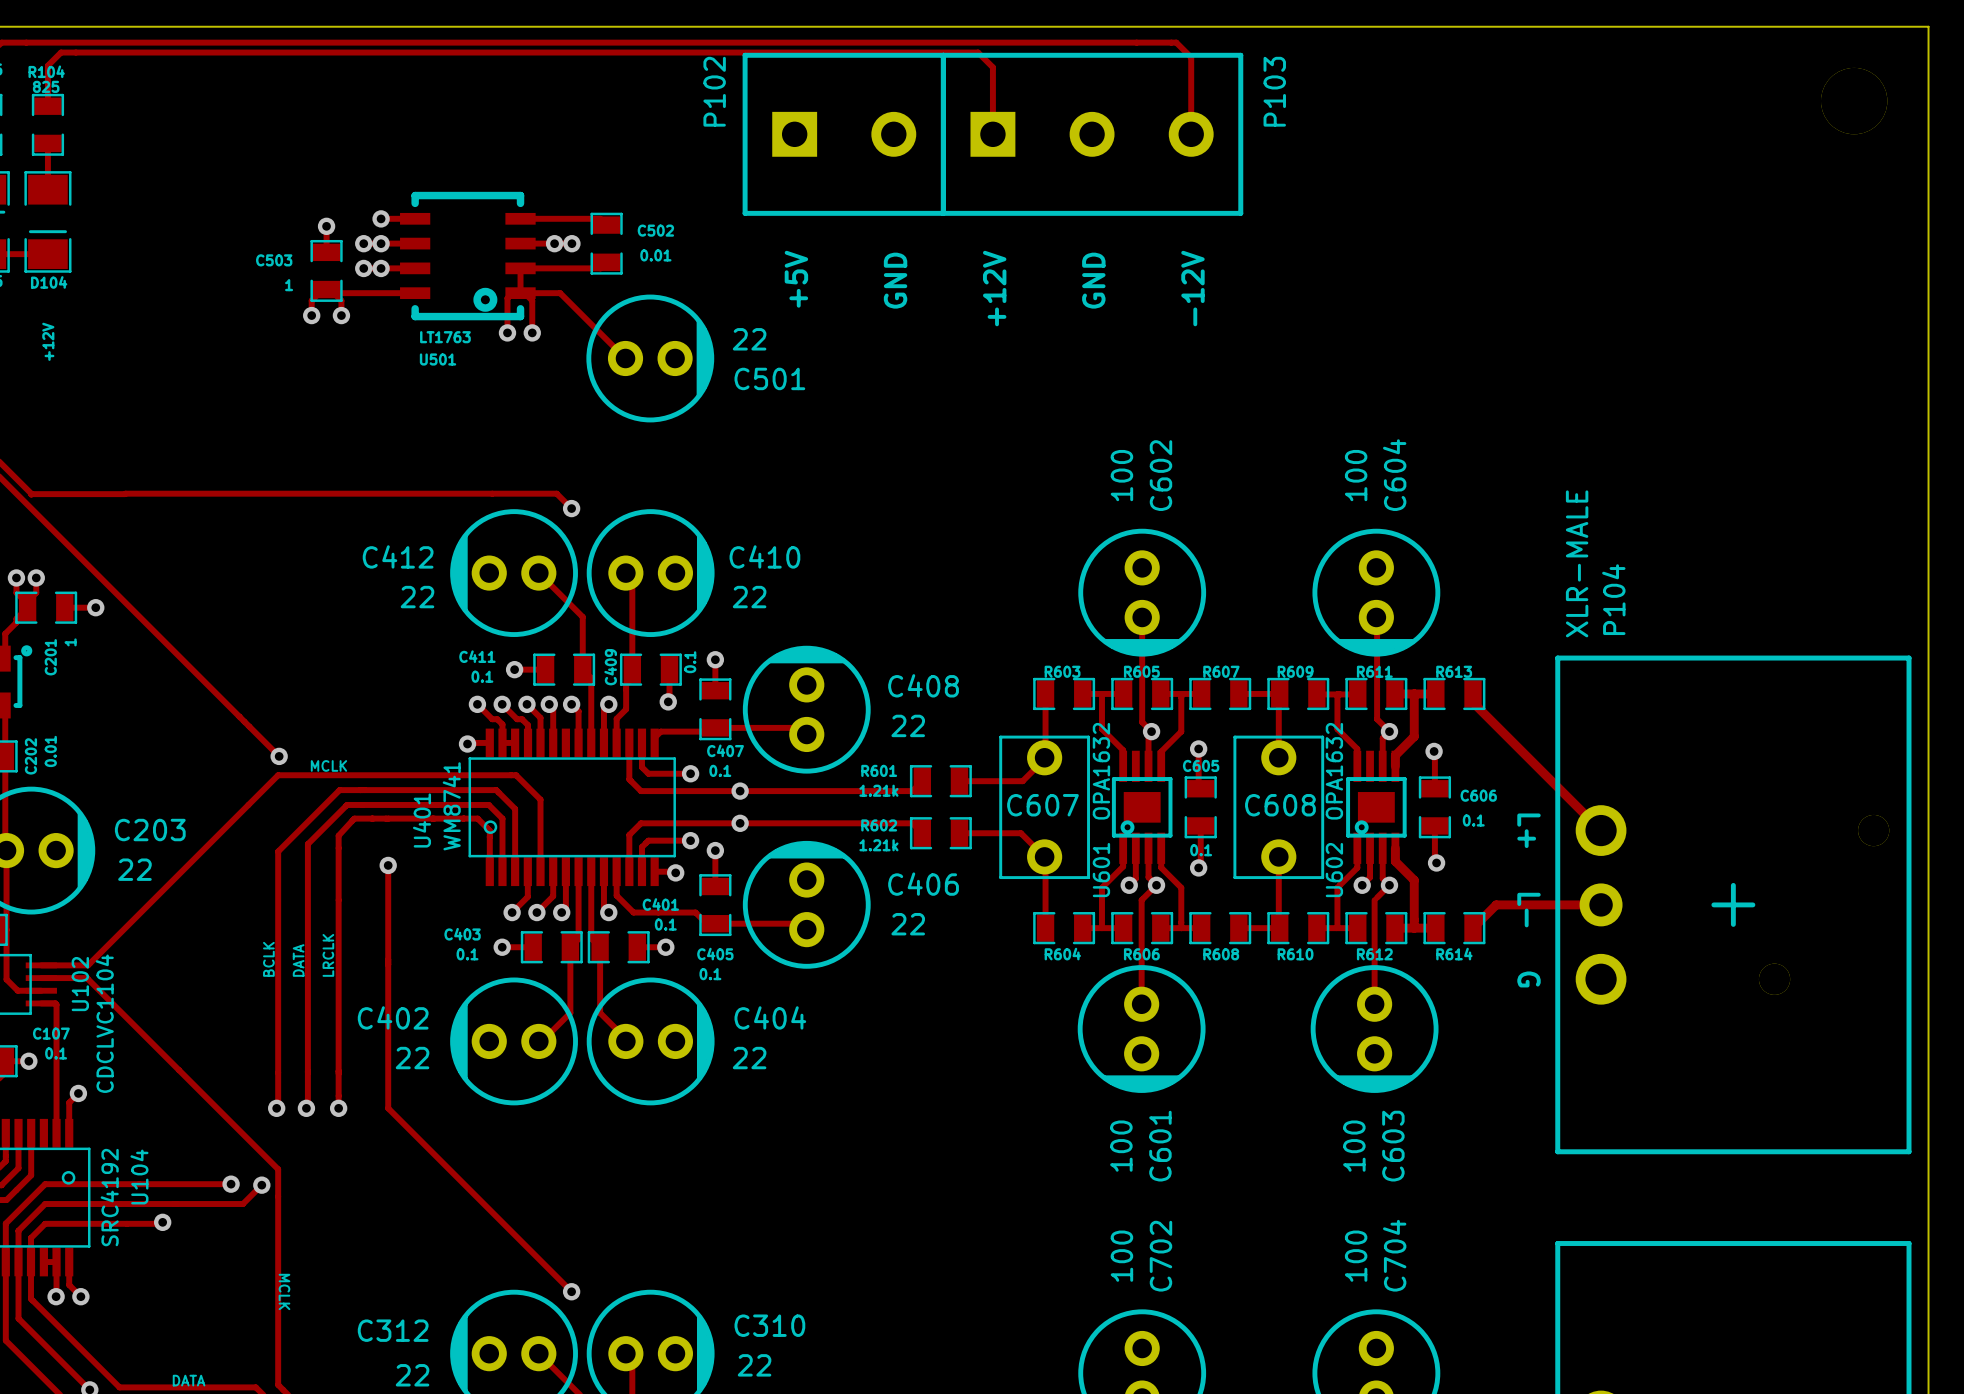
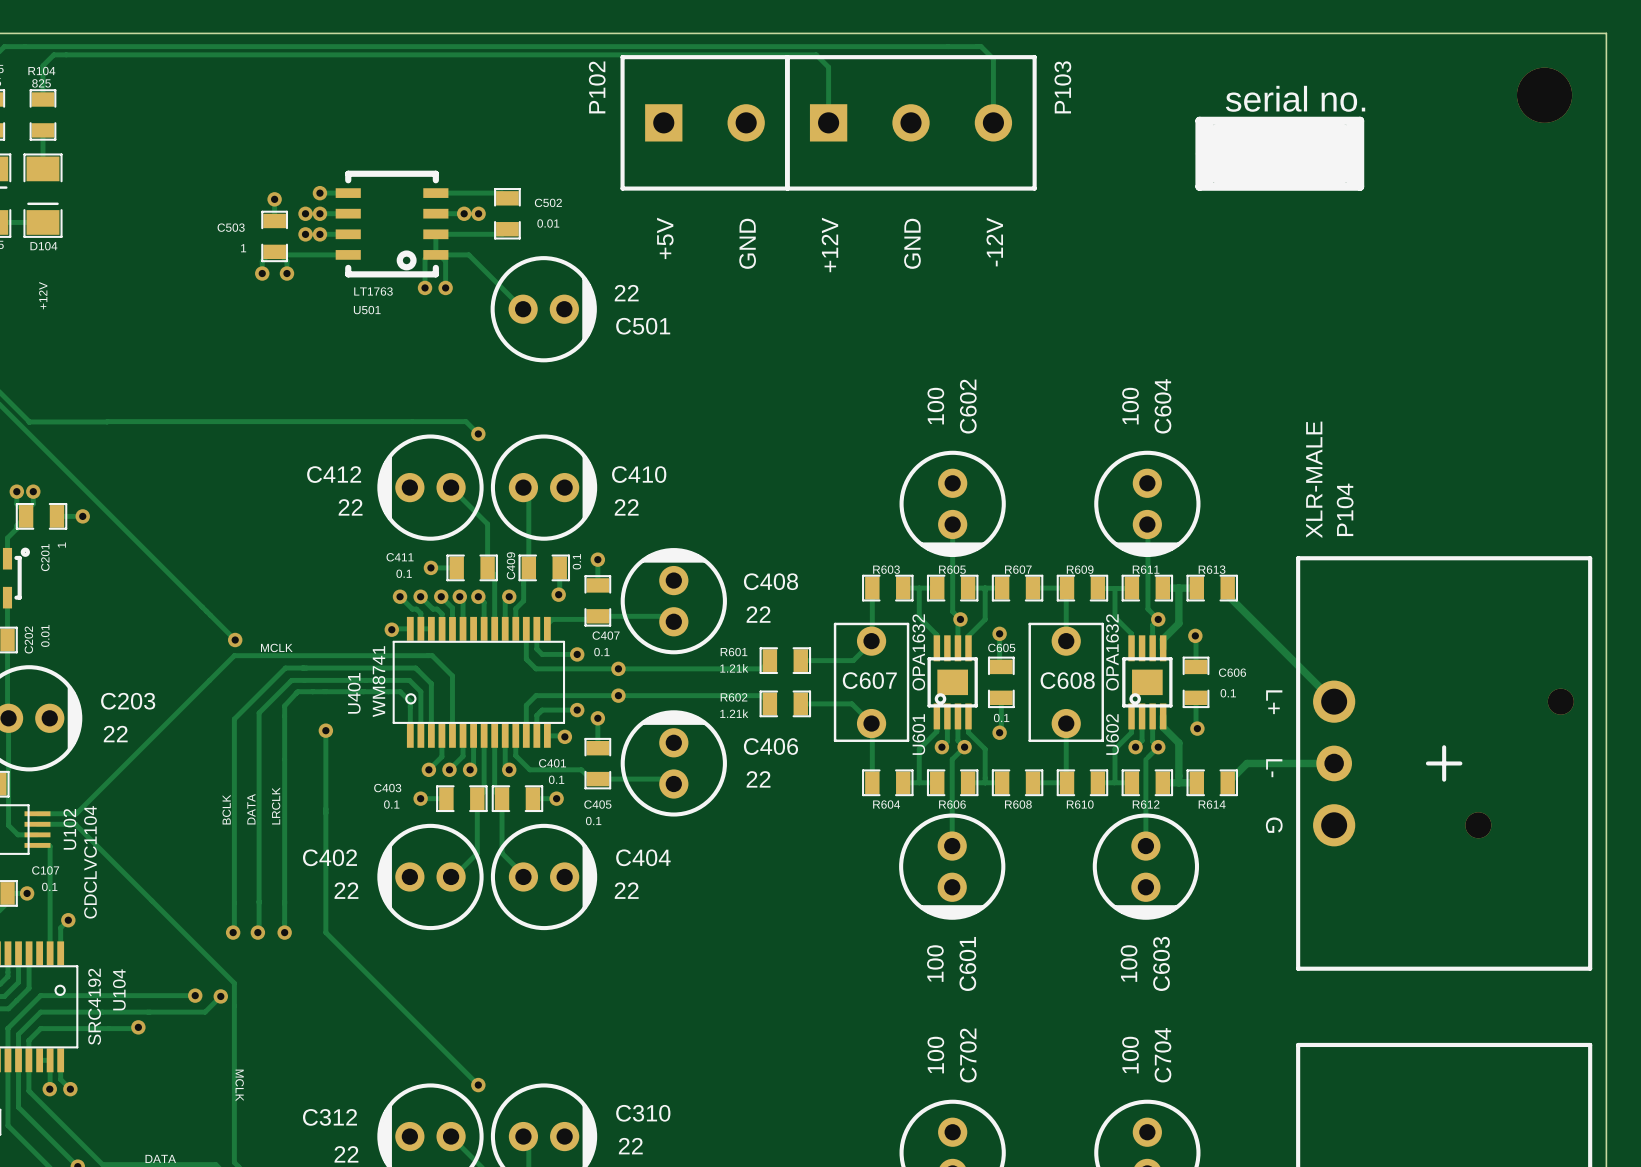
text: none -> serial no. (1295, 98)
line: none -> (1199, 120) (1199, 186) (1360, 186) (1360, 120) (1199, 120)
line: none -> (1207, 124) (1207, 182)
line: none -> (1351, 124) (1351, 182)
line: none -> (1228, 153) (1331, 153)

